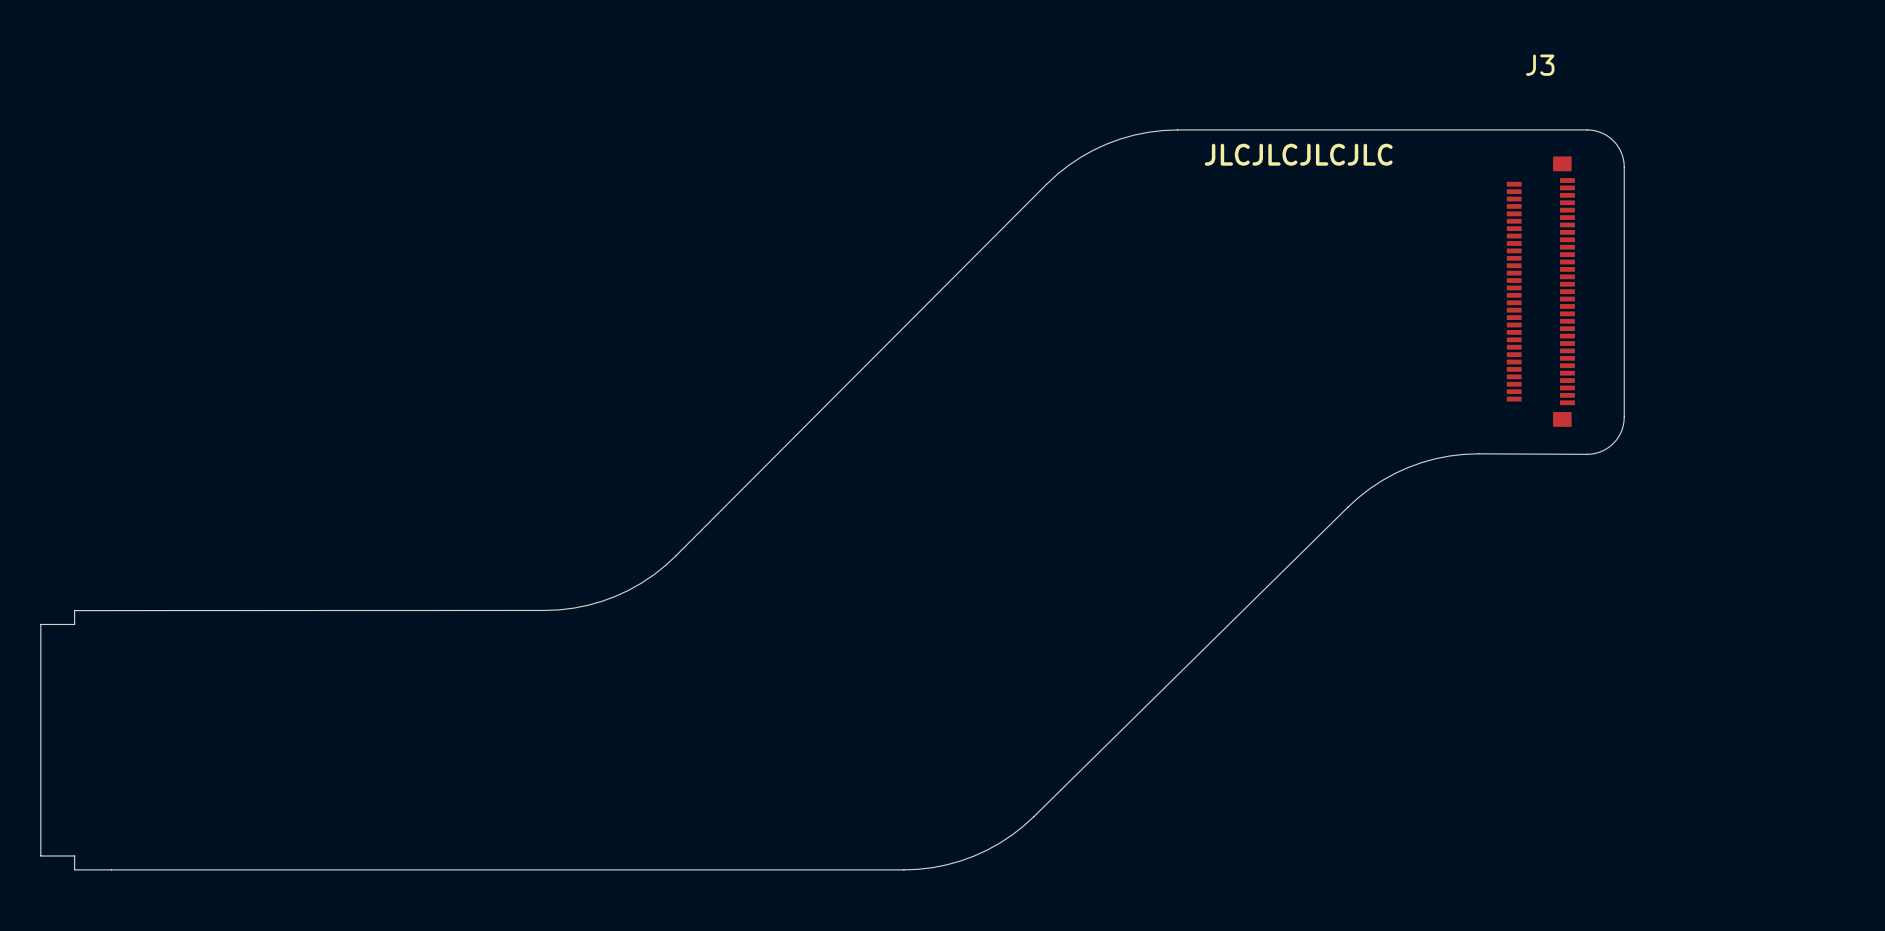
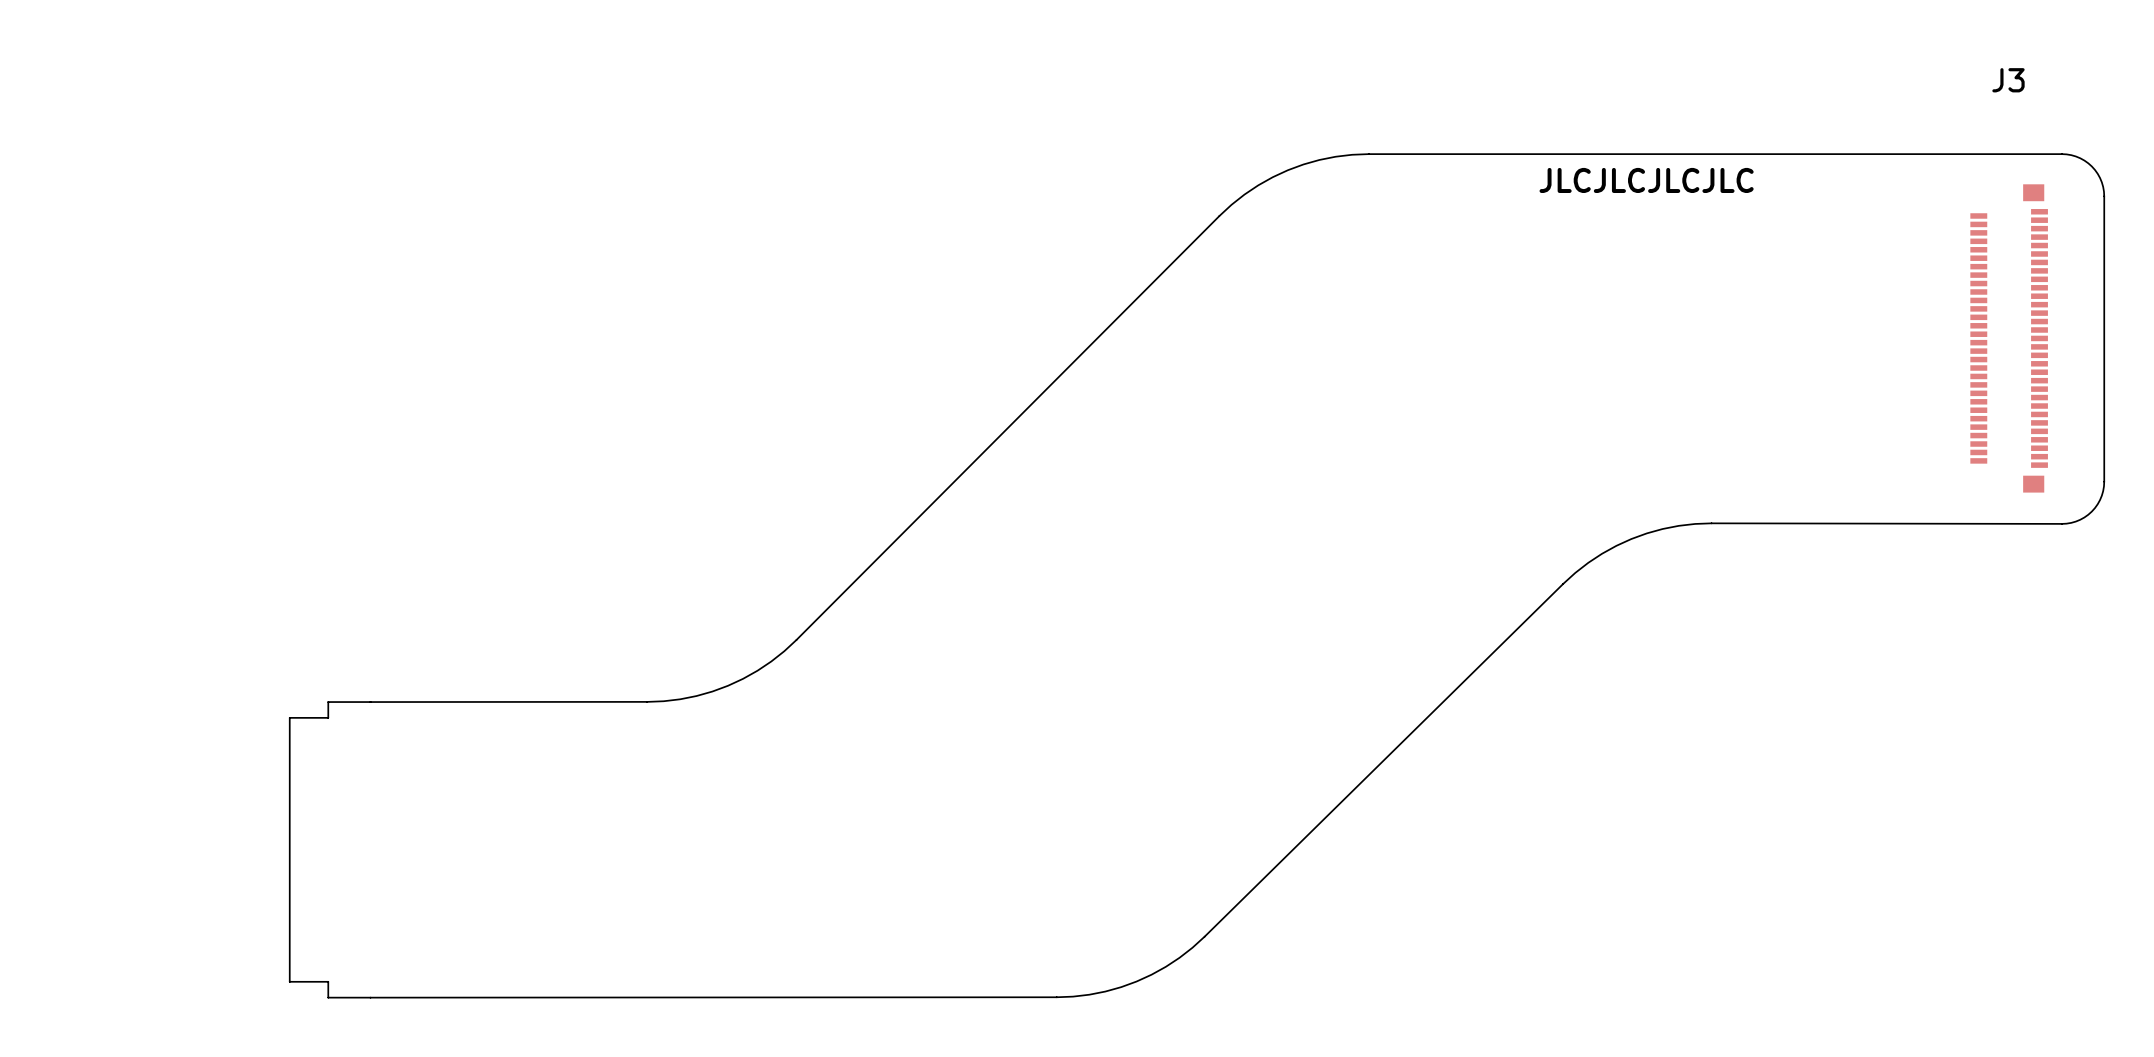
board edge: (1587, 129) (1599, 132) (1610, 138) (1618, 147) (1624, 162) (1624, 417) (1622, 429) (1613, 443) (1595, 453) (1478, 453) -> (1835, 154) (2066, 154) (2084, 160) (2095, 170) (2101, 182) (2104, 196) (2104, 481) (2101, 495) (2095, 508) (2088, 514) (2080, 519) (2066, 523) (1711, 523)
text position: JLCJLCJLCJLC (1298, 154) -> JLCJLCJLCJLC (1646, 180)
J3 position: (1540, 291) -> (2009, 338)
board edge: (1348, 507) (1033, 816) (999, 843) (960, 860) (932, 867) (903, 869) (111, 869) -> (1563, 583) (1204, 936) (1165, 966) (1121, 987) (1089, 994) (1056, 997) (370, 997)
board edge: (544, 610) (111, 610) -> (647, 701) (370, 702)
part position: (76, 740) -> (330, 849)

